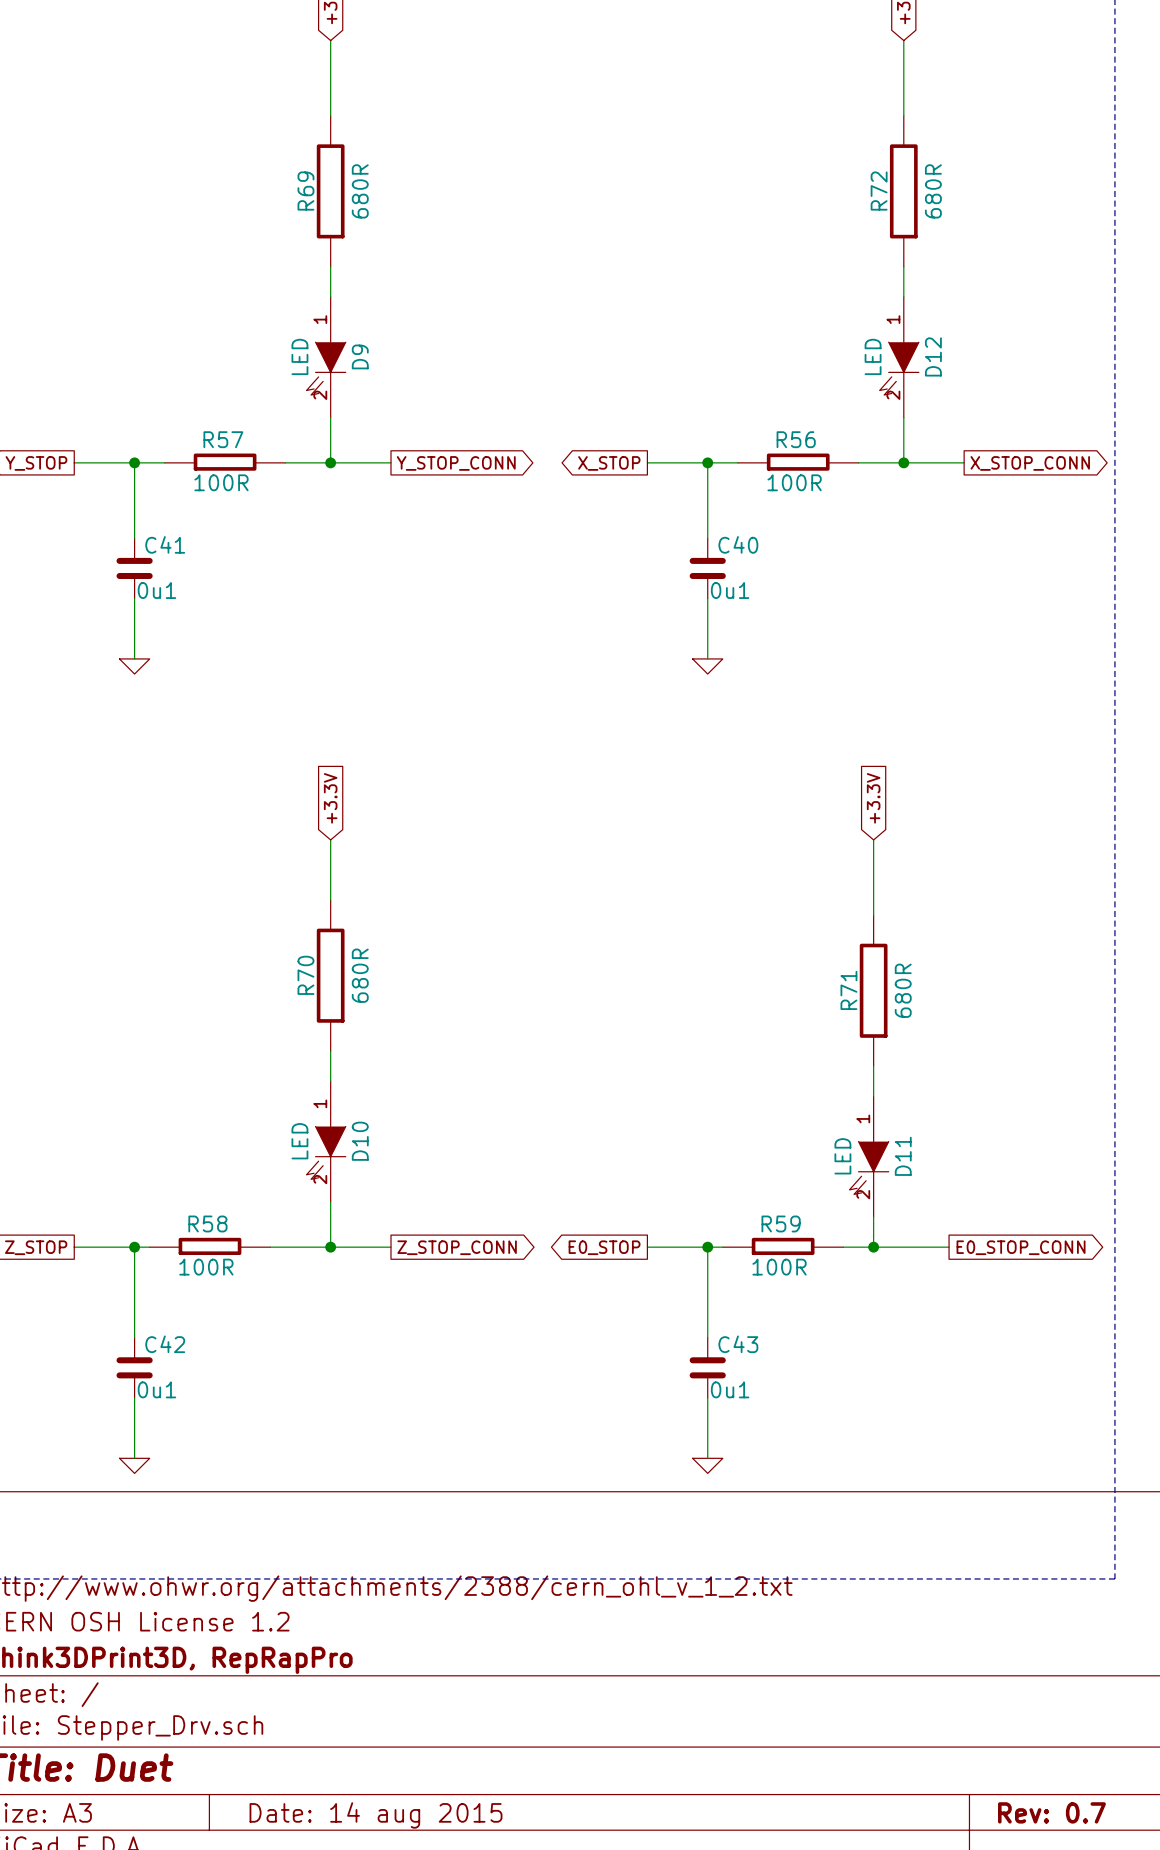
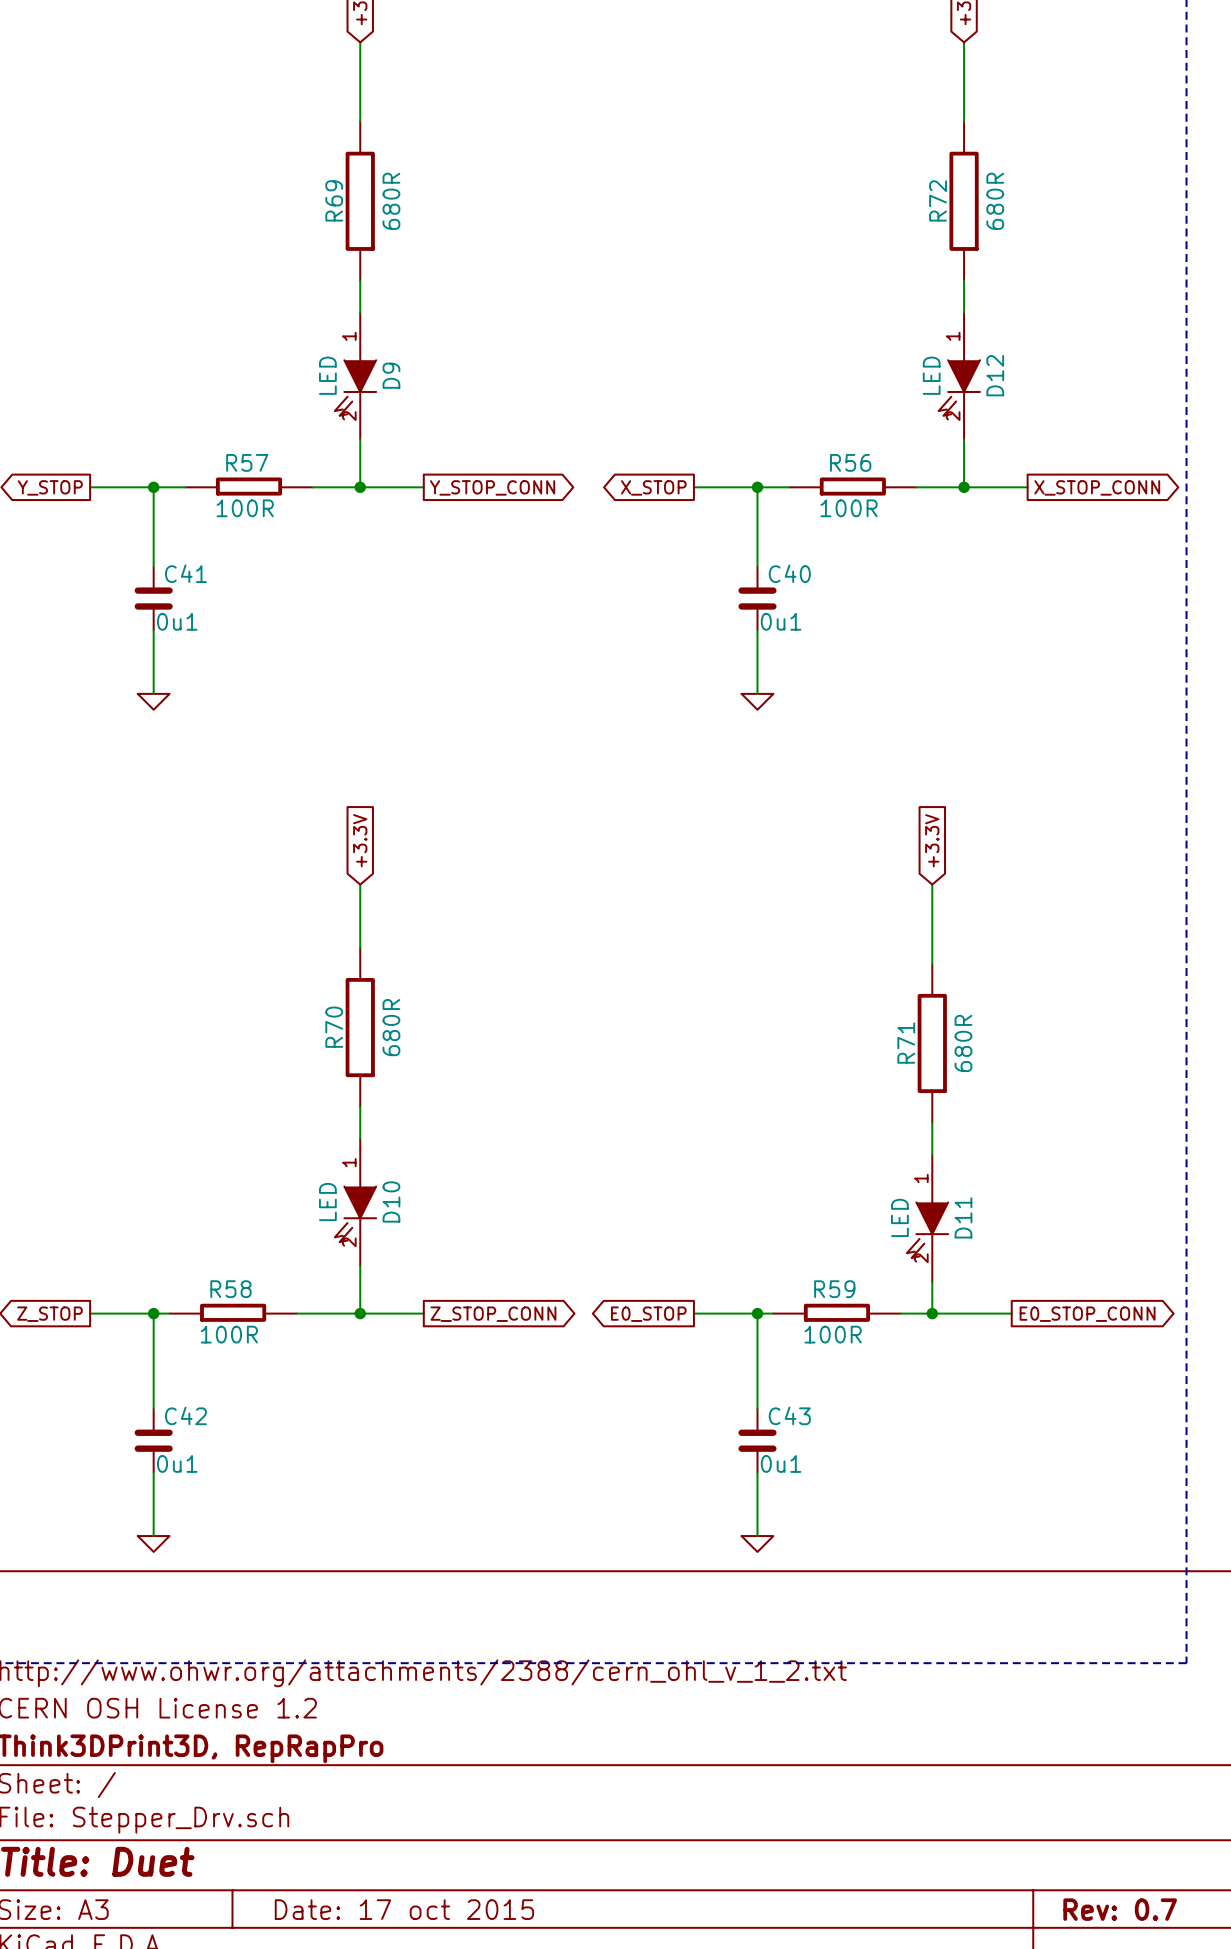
title block: Date: 14 aug 2015 (376, 1815) -> Date: 17 oct 2015 (404, 1909)

